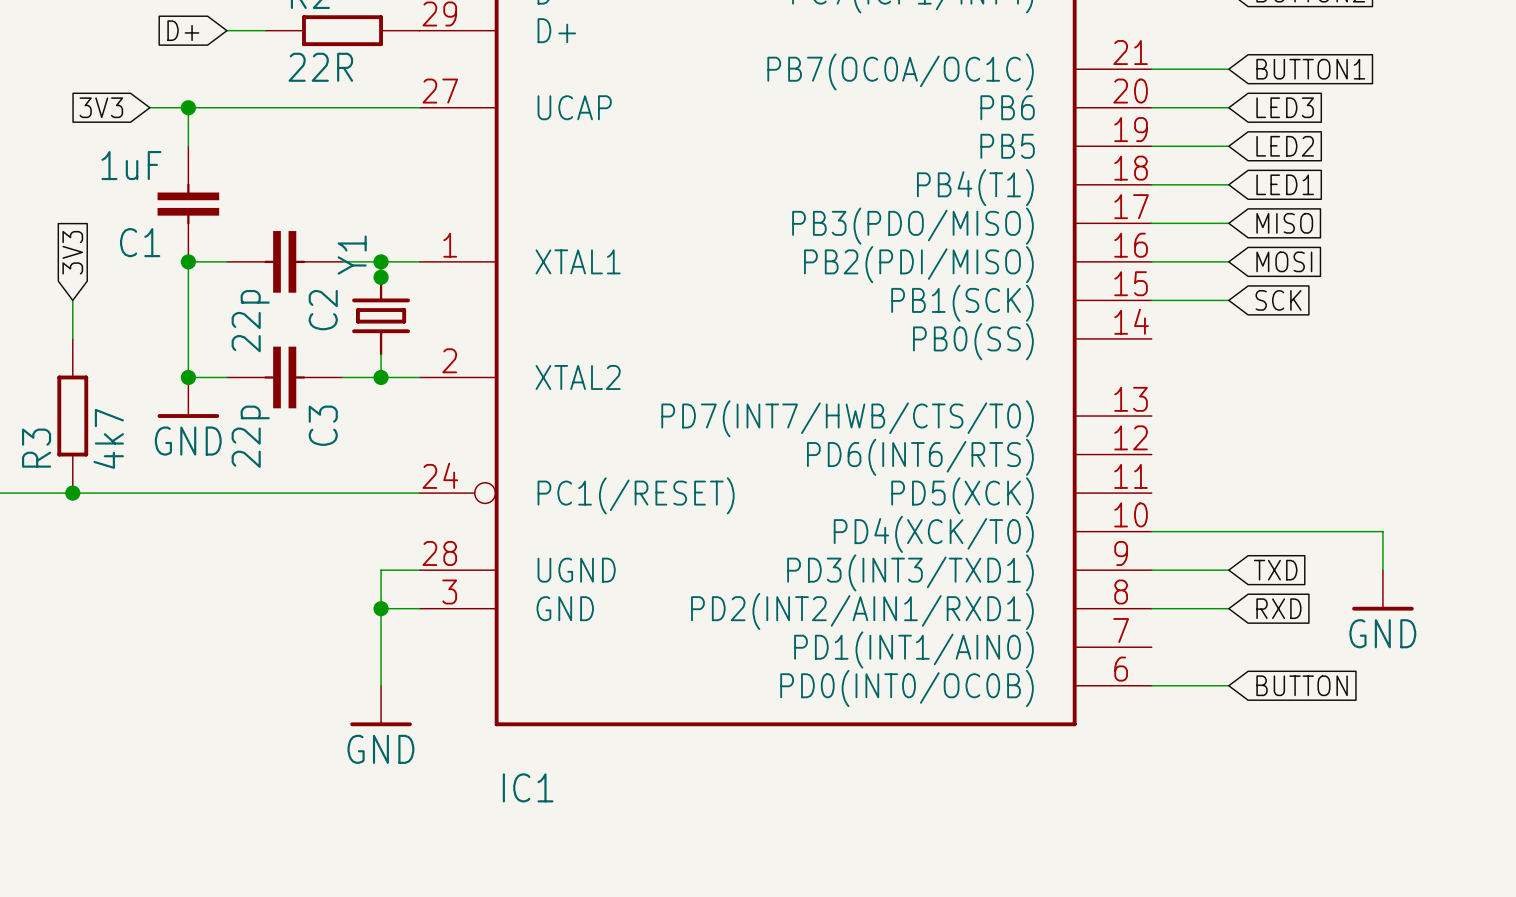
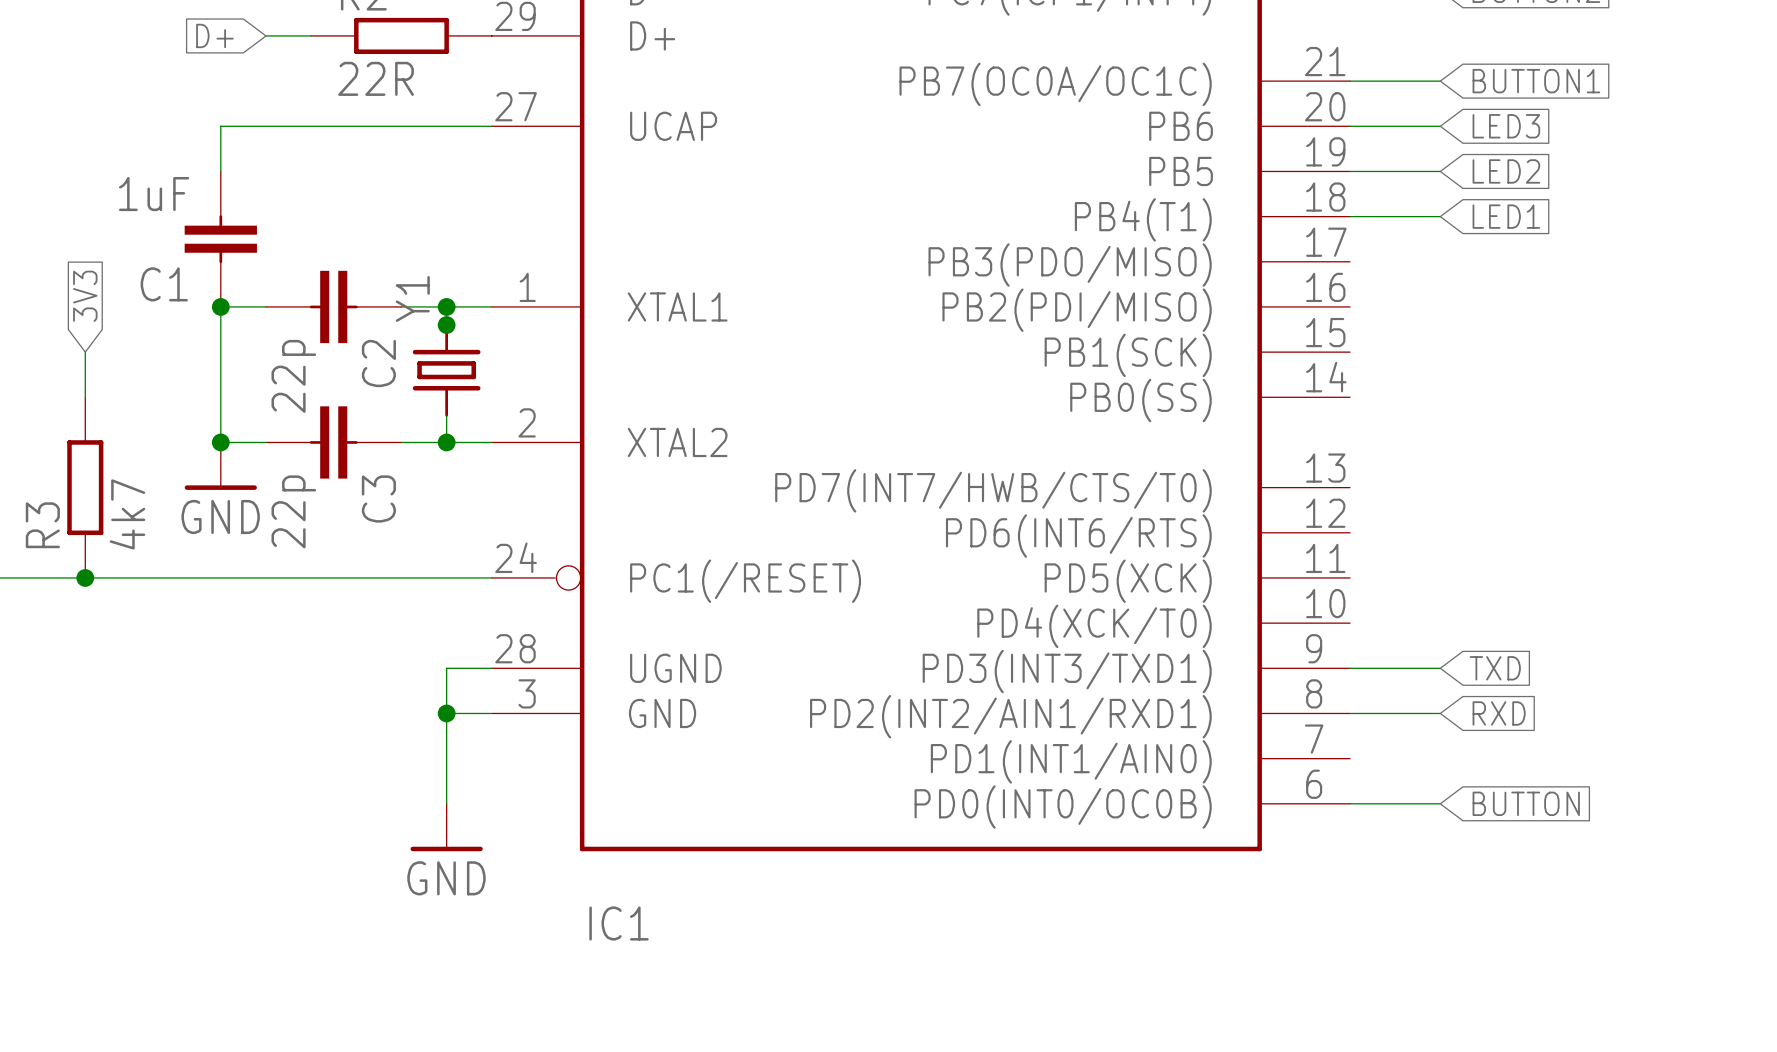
global label: 3V3 (101, 107) -> none
wire: (149, 107) (188, 107) -> none
junction: (188, 107) -> none
wire: (1151, 223) (1228, 223) -> none
global label: MISO (1284, 223) -> none
wire: (1151, 261) (1228, 261) -> none
global label: MOSI (1284, 261) -> none
wire: (1151, 300) (1228, 300) -> none
global label: SCK (1278, 300) -> none
wire: (1151, 531) (1382, 531) (1382, 570) -> none
power symbol: GND (1382, 590) -> none

